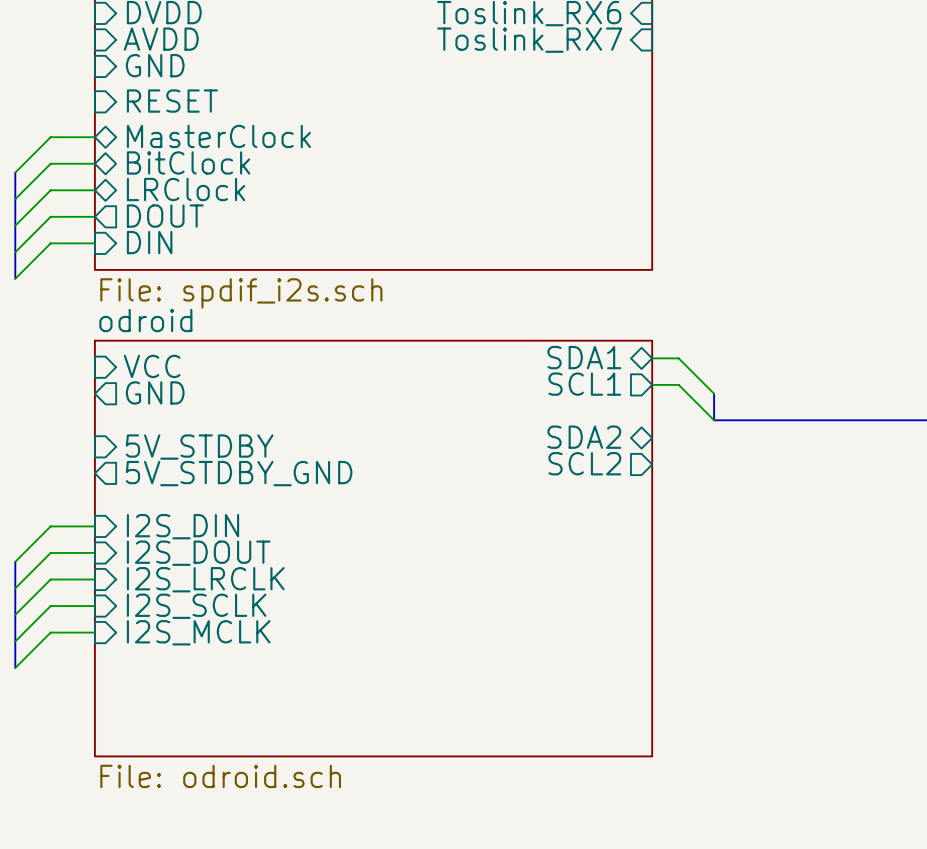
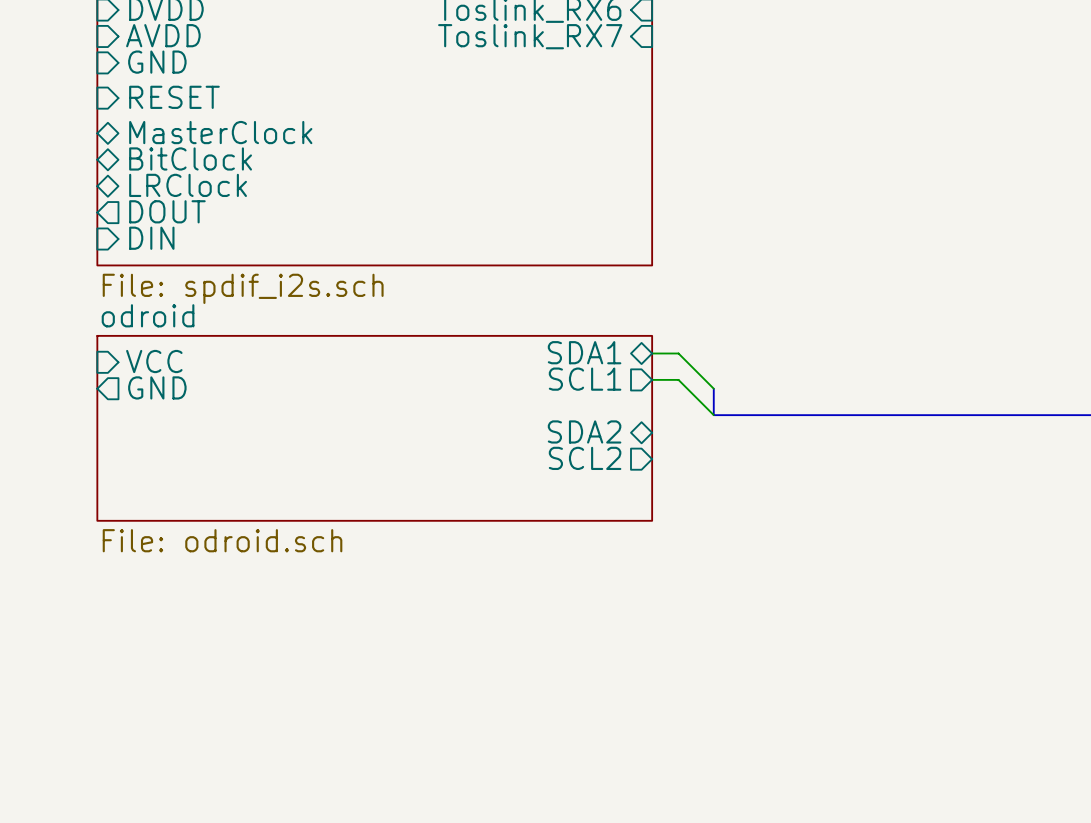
wire: (94, 137) (50, 137) (15, 172) -> none
wire: (94, 163) (50, 163) (15, 199) -> none
bus: (15, 172) (15, 278) -> none
wire: (94, 190) (50, 190) (15, 225) -> none
wire: (94, 216) (50, 216) (15, 252) -> none
wire: (94, 243) (50, 243) (15, 278) -> none
sheet odroid: none -> File: odroid.sch (374, 428)
sheet pin: 5V_STDBY (199, 447) -> none
sheet pin: 5V_STDBY_GND (239, 473) -> none
wire: (94, 526) (50, 526) (15, 561) -> none
sheet pin: I2S_DIN (182, 526) -> none
sheet odroid: File: odroid.sch (373, 548) -> none
wire: (94, 552) (50, 552) (15, 588) -> none
sheet pin: I2S_DOUT (198, 553) -> none
bus: (15, 561) (15, 667) -> none
wire: (94, 579) (50, 579) (15, 614) -> none
sheet pin: I2S_LRCLK (205, 579) -> none
wire: (94, 606) (50, 606) (15, 641) -> none
sheet pin: I2S_SCLK (196, 606) -> none
wire: (94, 632) (50, 632) (15, 667) -> none
sheet pin: I2S_MCLK (198, 632) -> none

